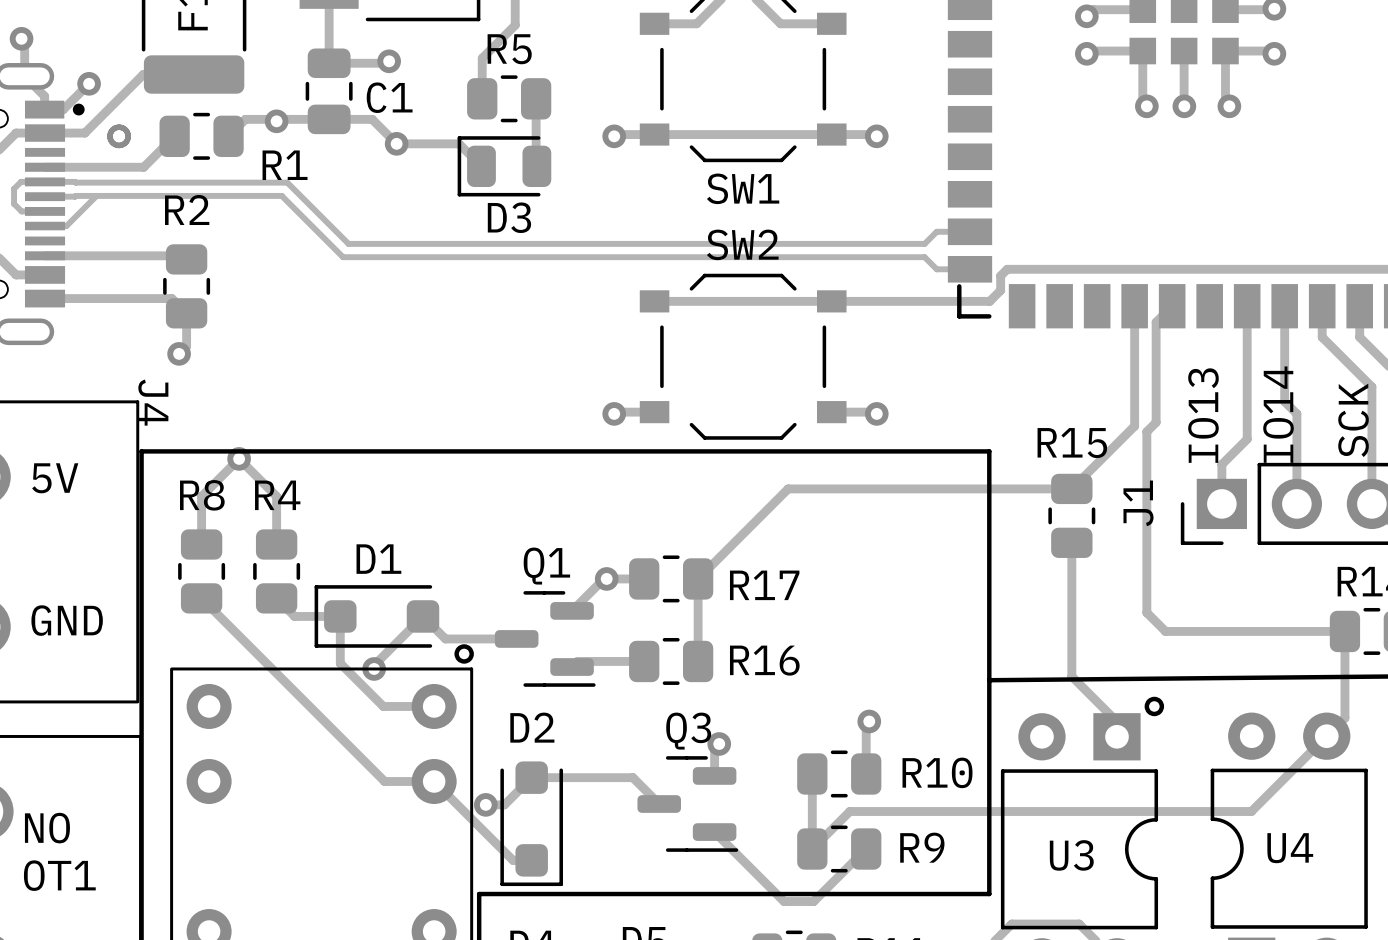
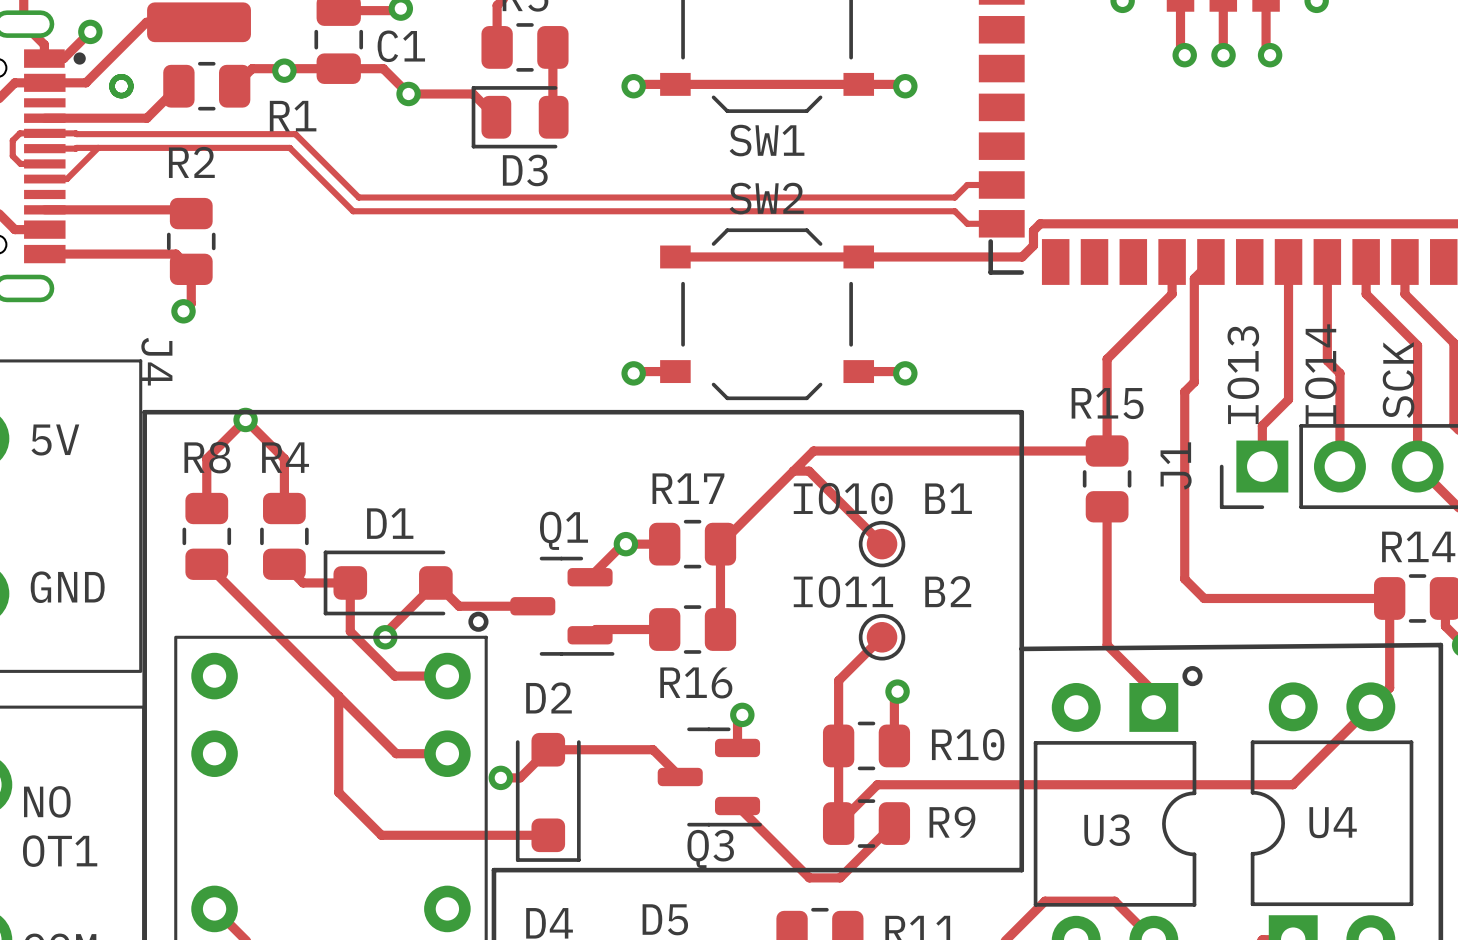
track: (1134, 337) (1134, 426) (1071, 488) -> (1172, 294) (1107, 359) (1107, 451)
track: none -> (793, 471) (809, 471) (882, 544)
IO10 B1: none -> (882, 544)
R17 name position: R17 (764, 585) -> R17 (688, 488)
R16 name position: R16 (764, 660) -> R16 (696, 682)
track: none -> (882, 637) (838, 680) (838, 745)
IO11 B2: none -> (882, 637)
Q3 name position: Q3 (688, 731) -> Q3 (710, 849)
track: (434, 781) (513, 860) -> (338, 696) (338, 792) (381, 835) (528, 835)

